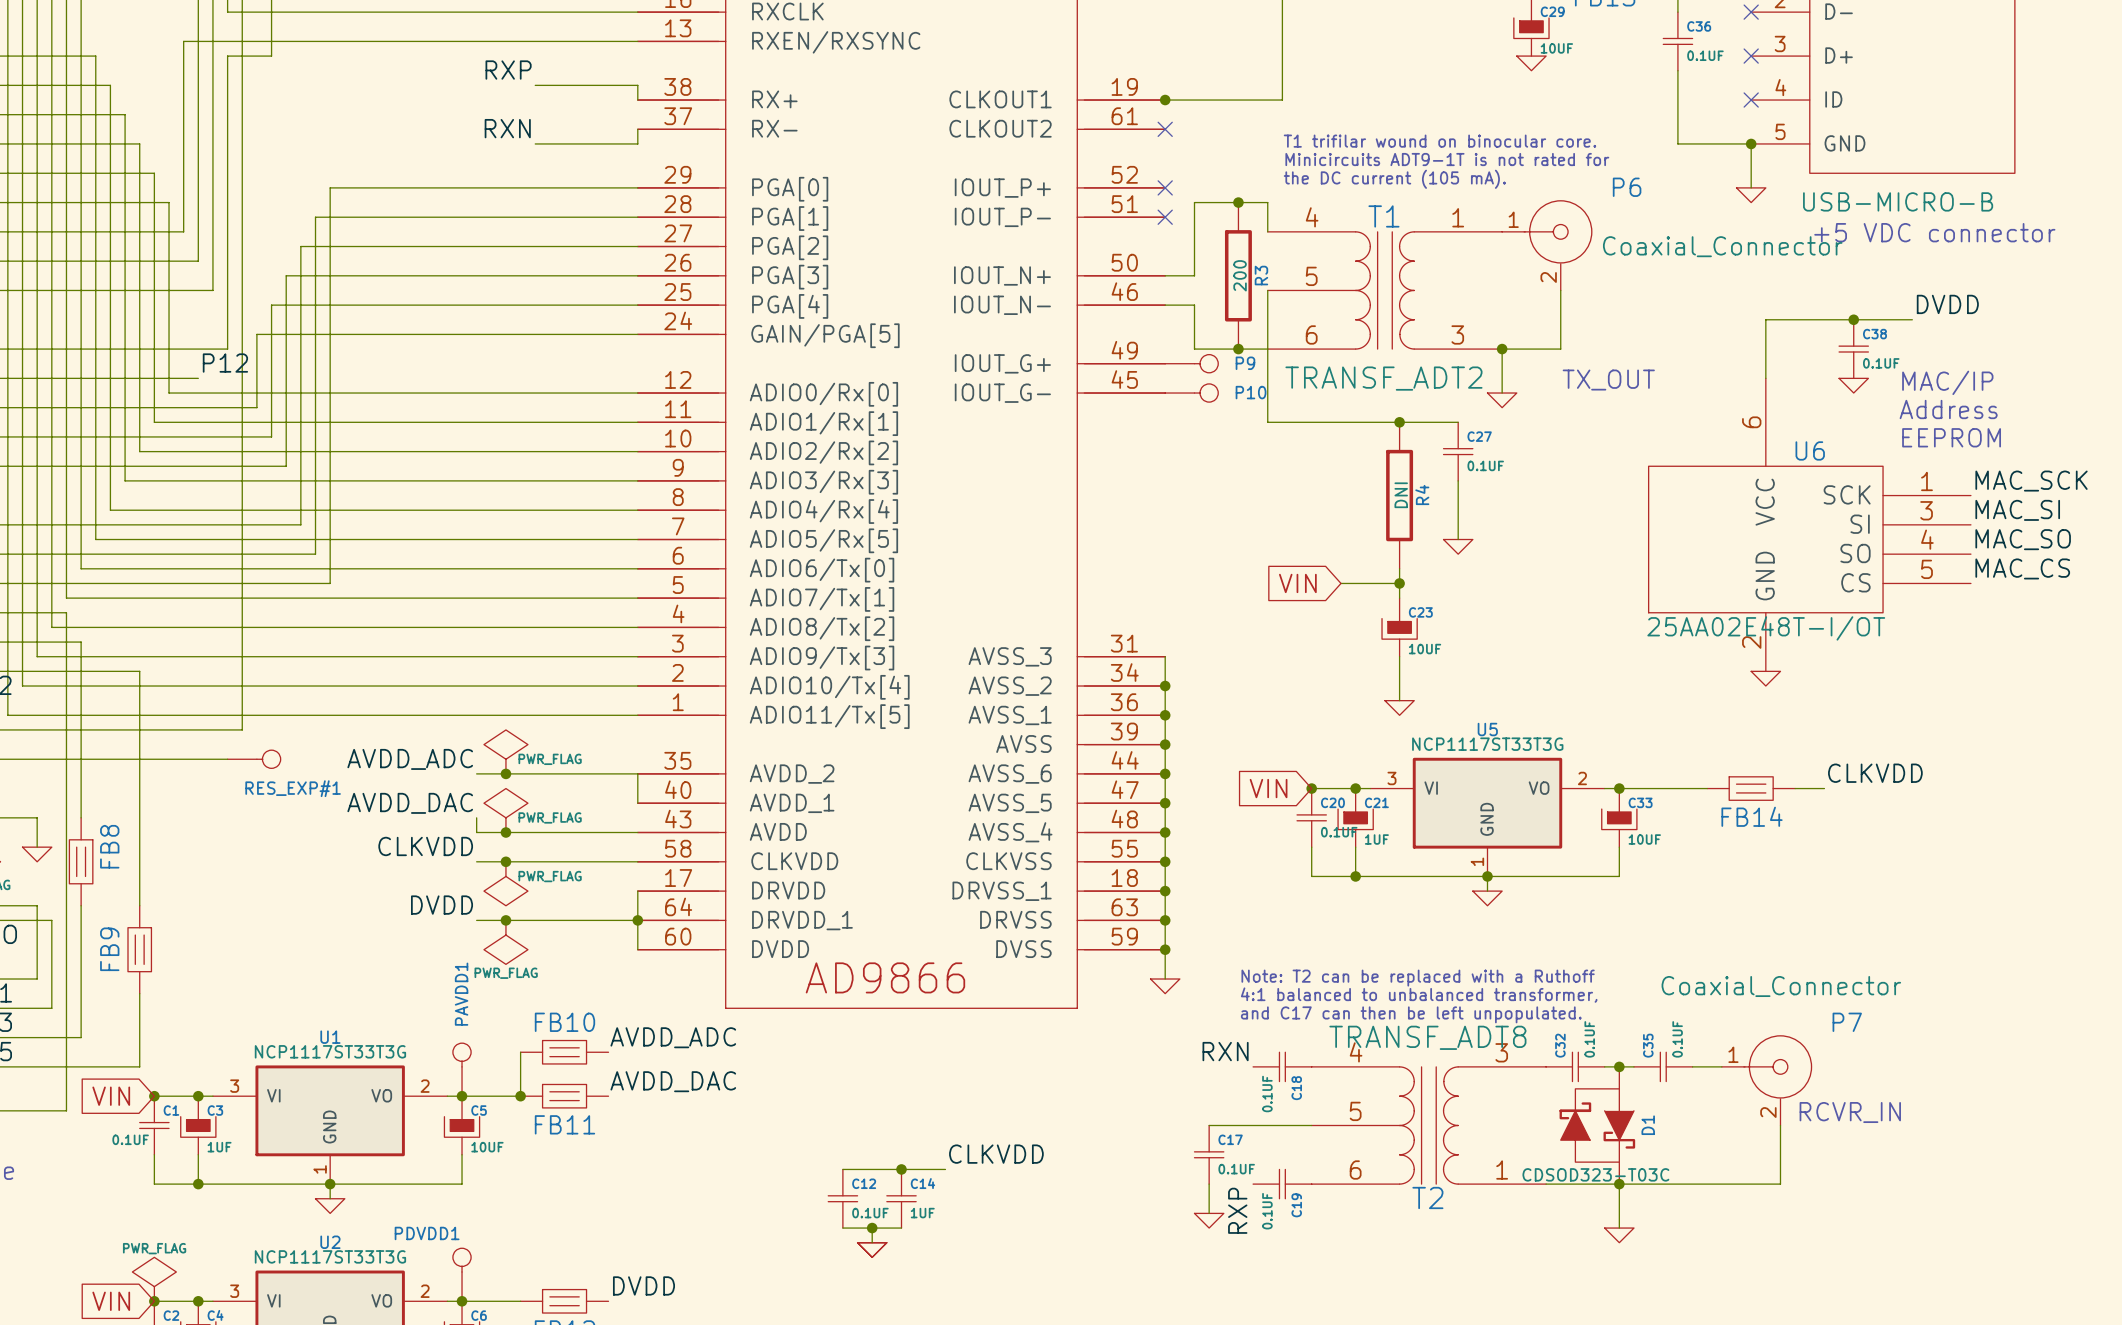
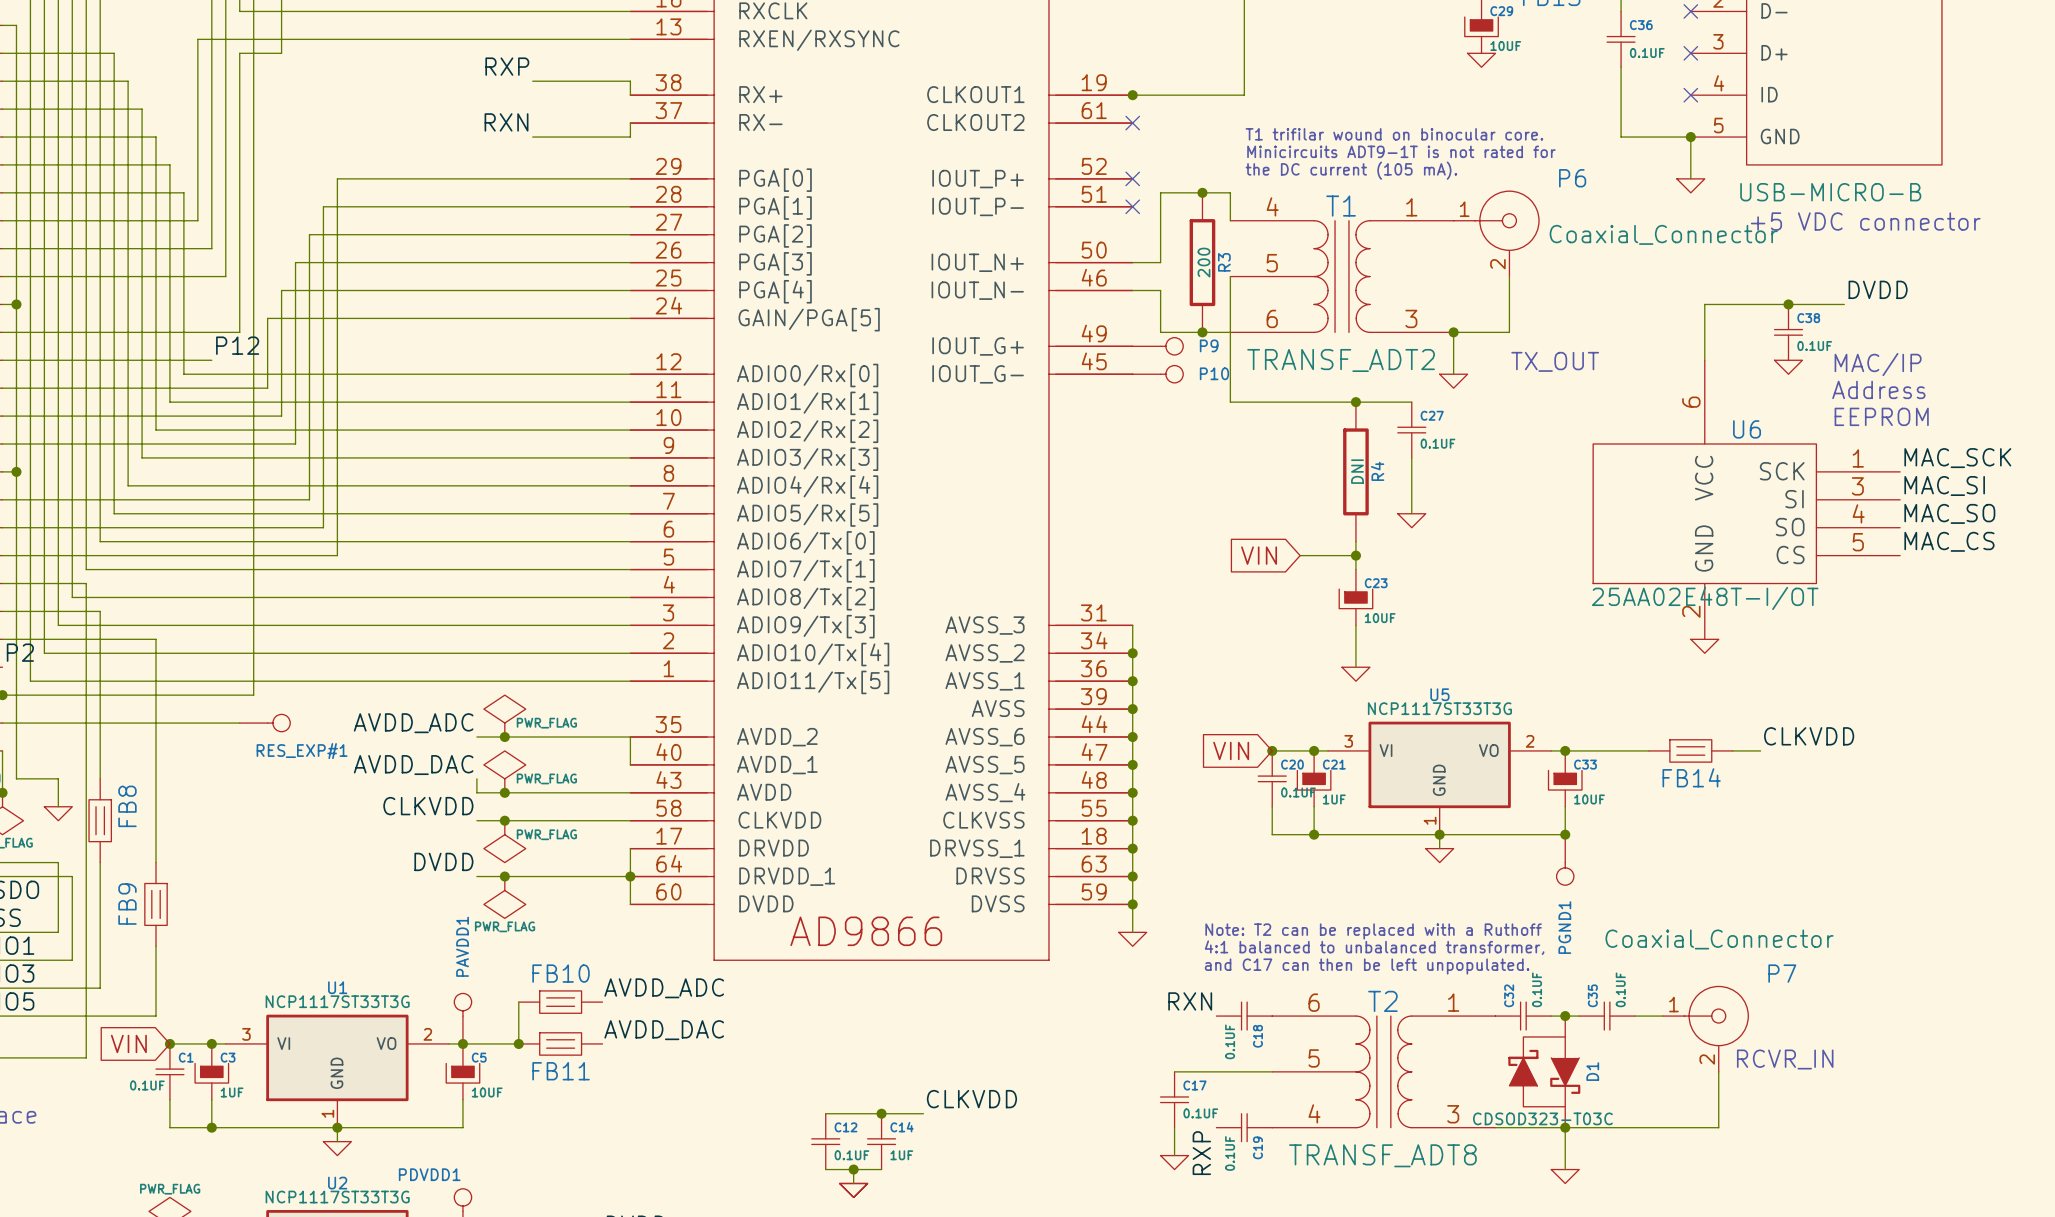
junction: none -> (1565, 834)
PGND1: none -> (1565, 859)
T2 flip: as is (1428, 1125) -> up-down (1383, 1071)

